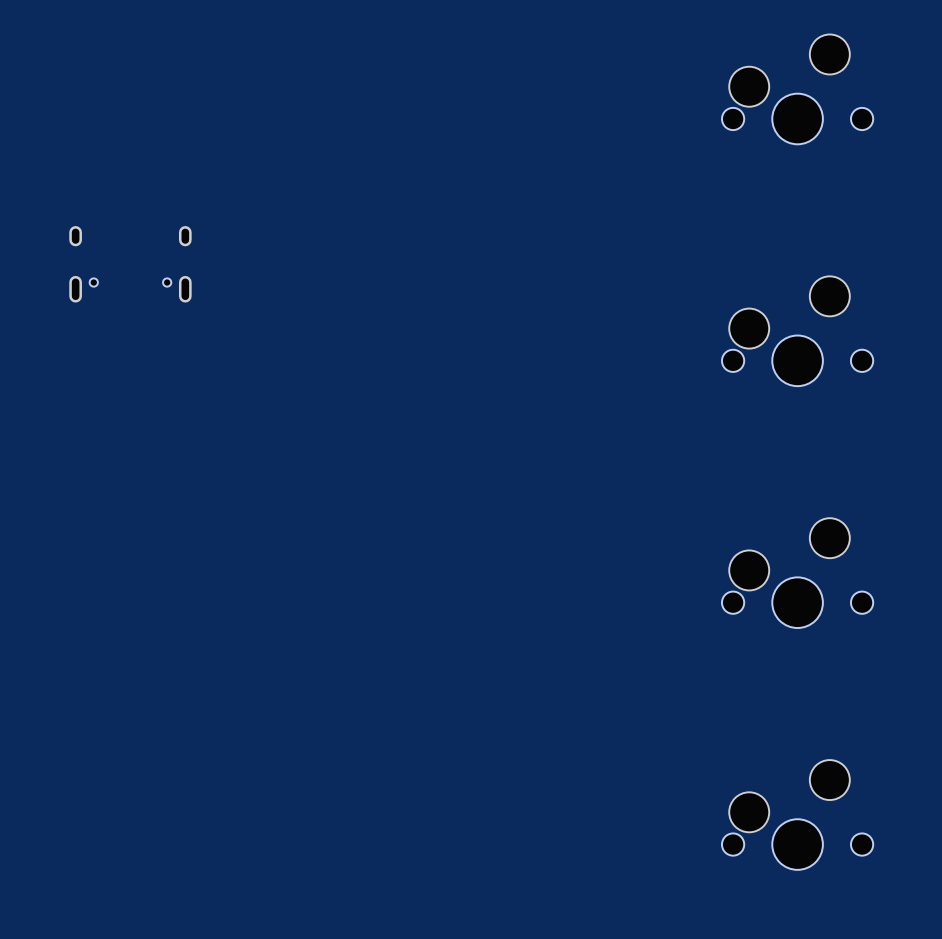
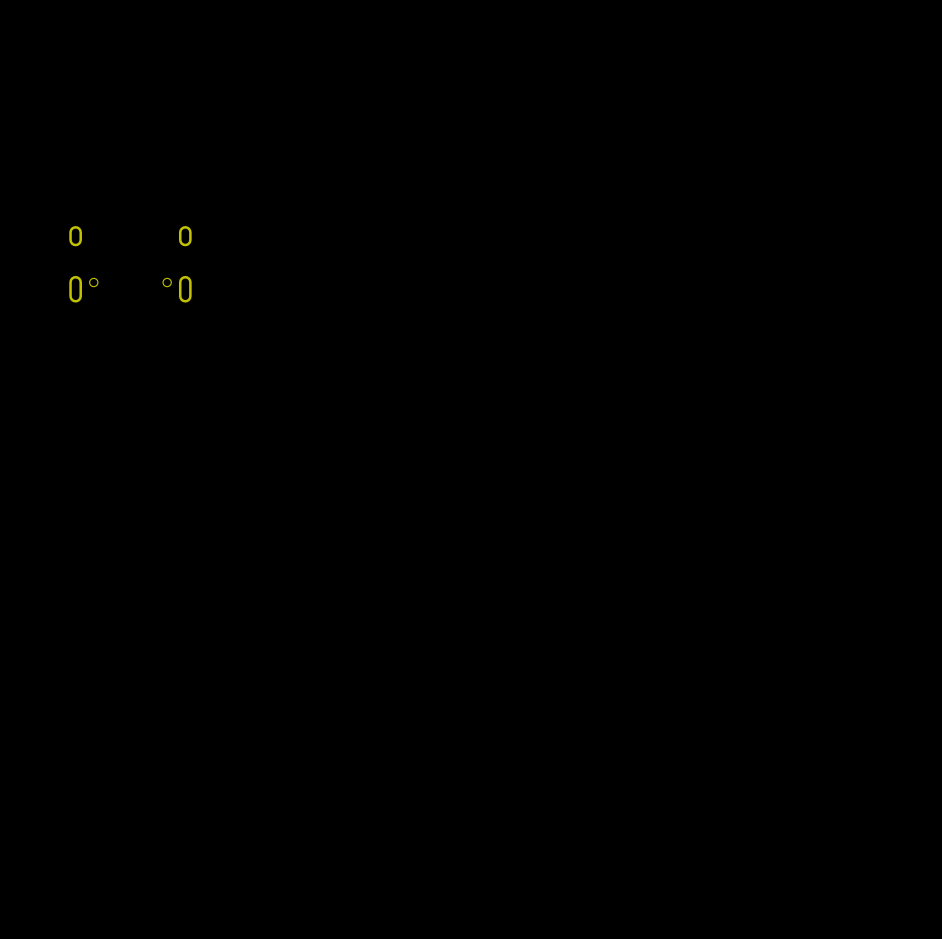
part: (797, 88) -> none
part: (797, 330) -> none
part: (797, 572) -> none
part: (797, 814) -> none

